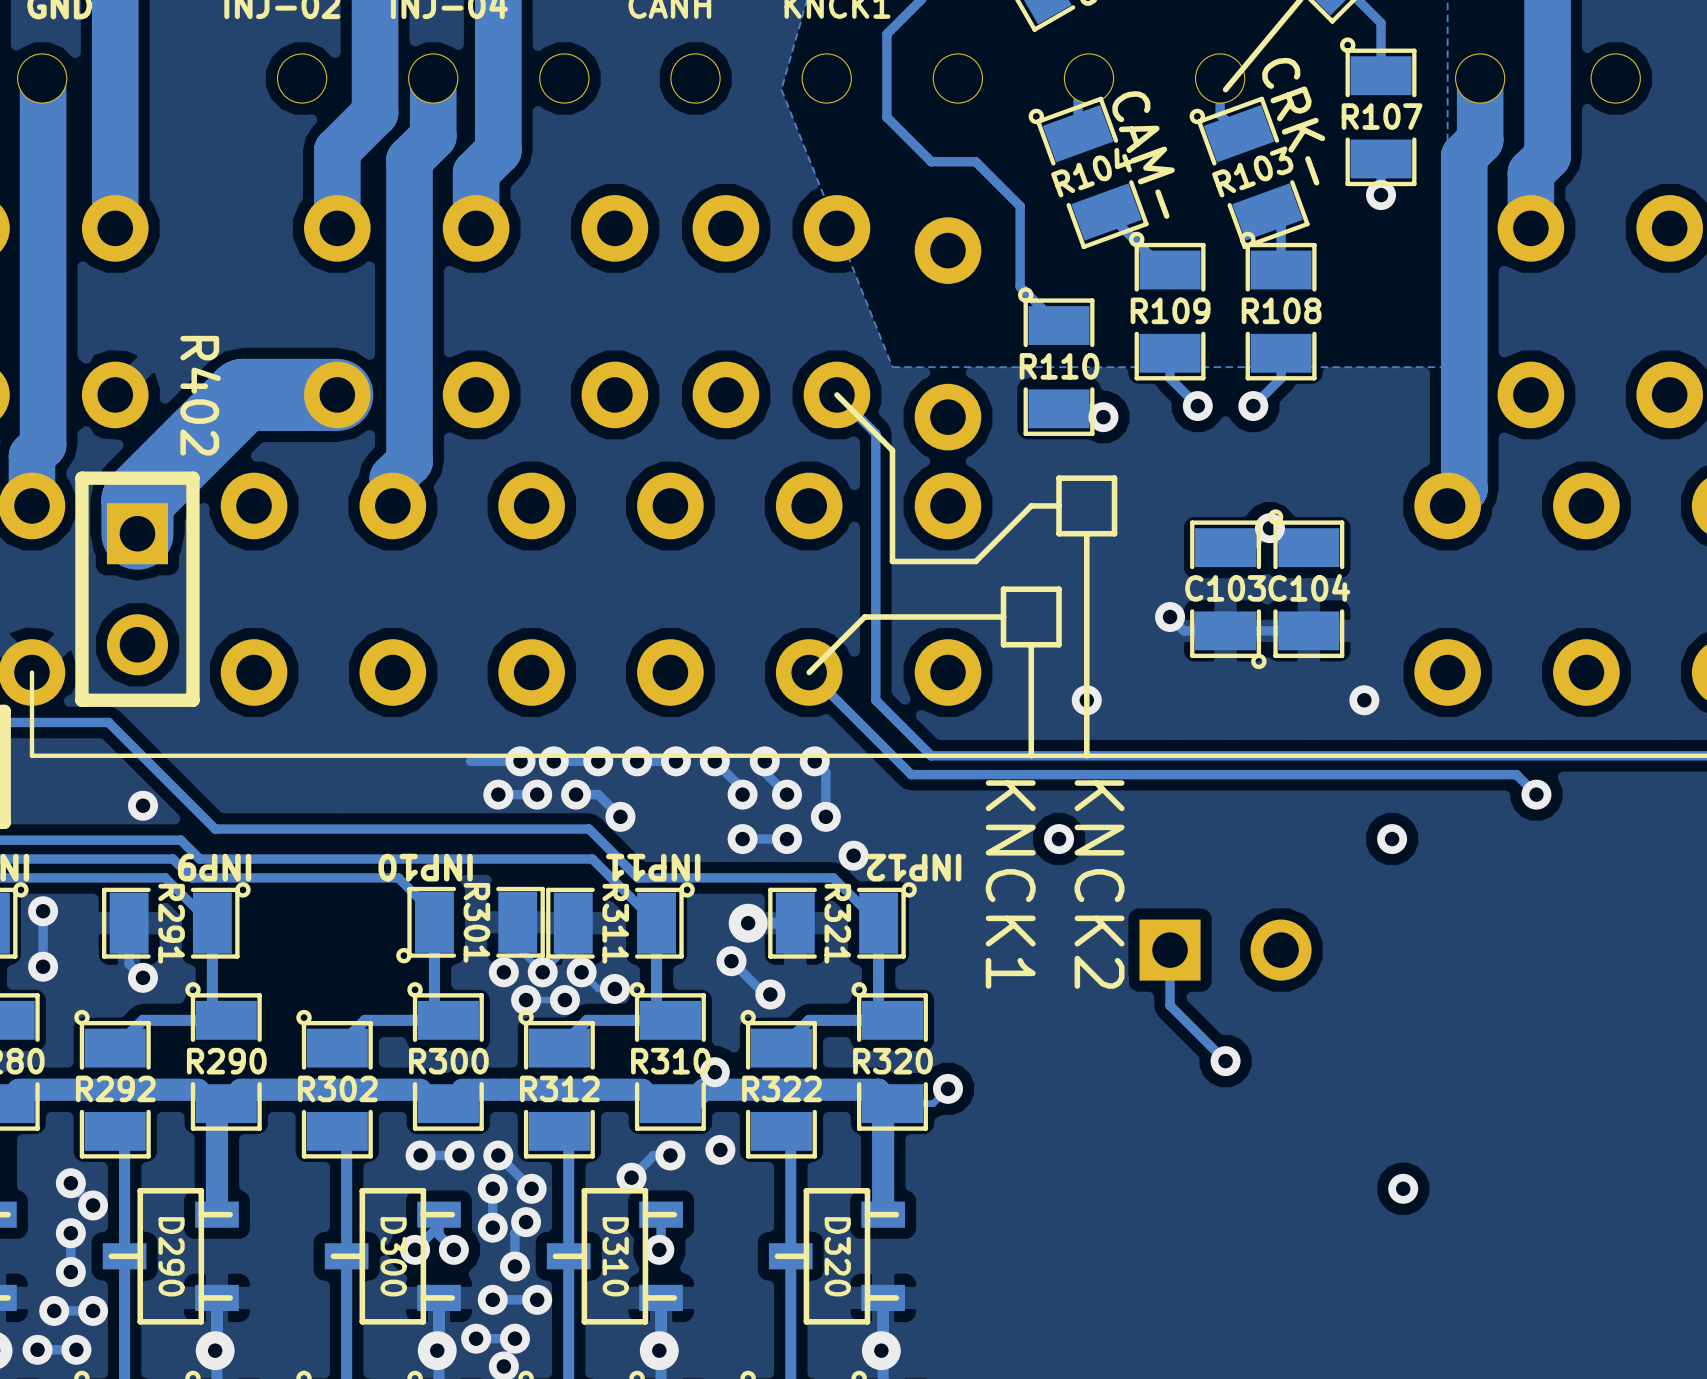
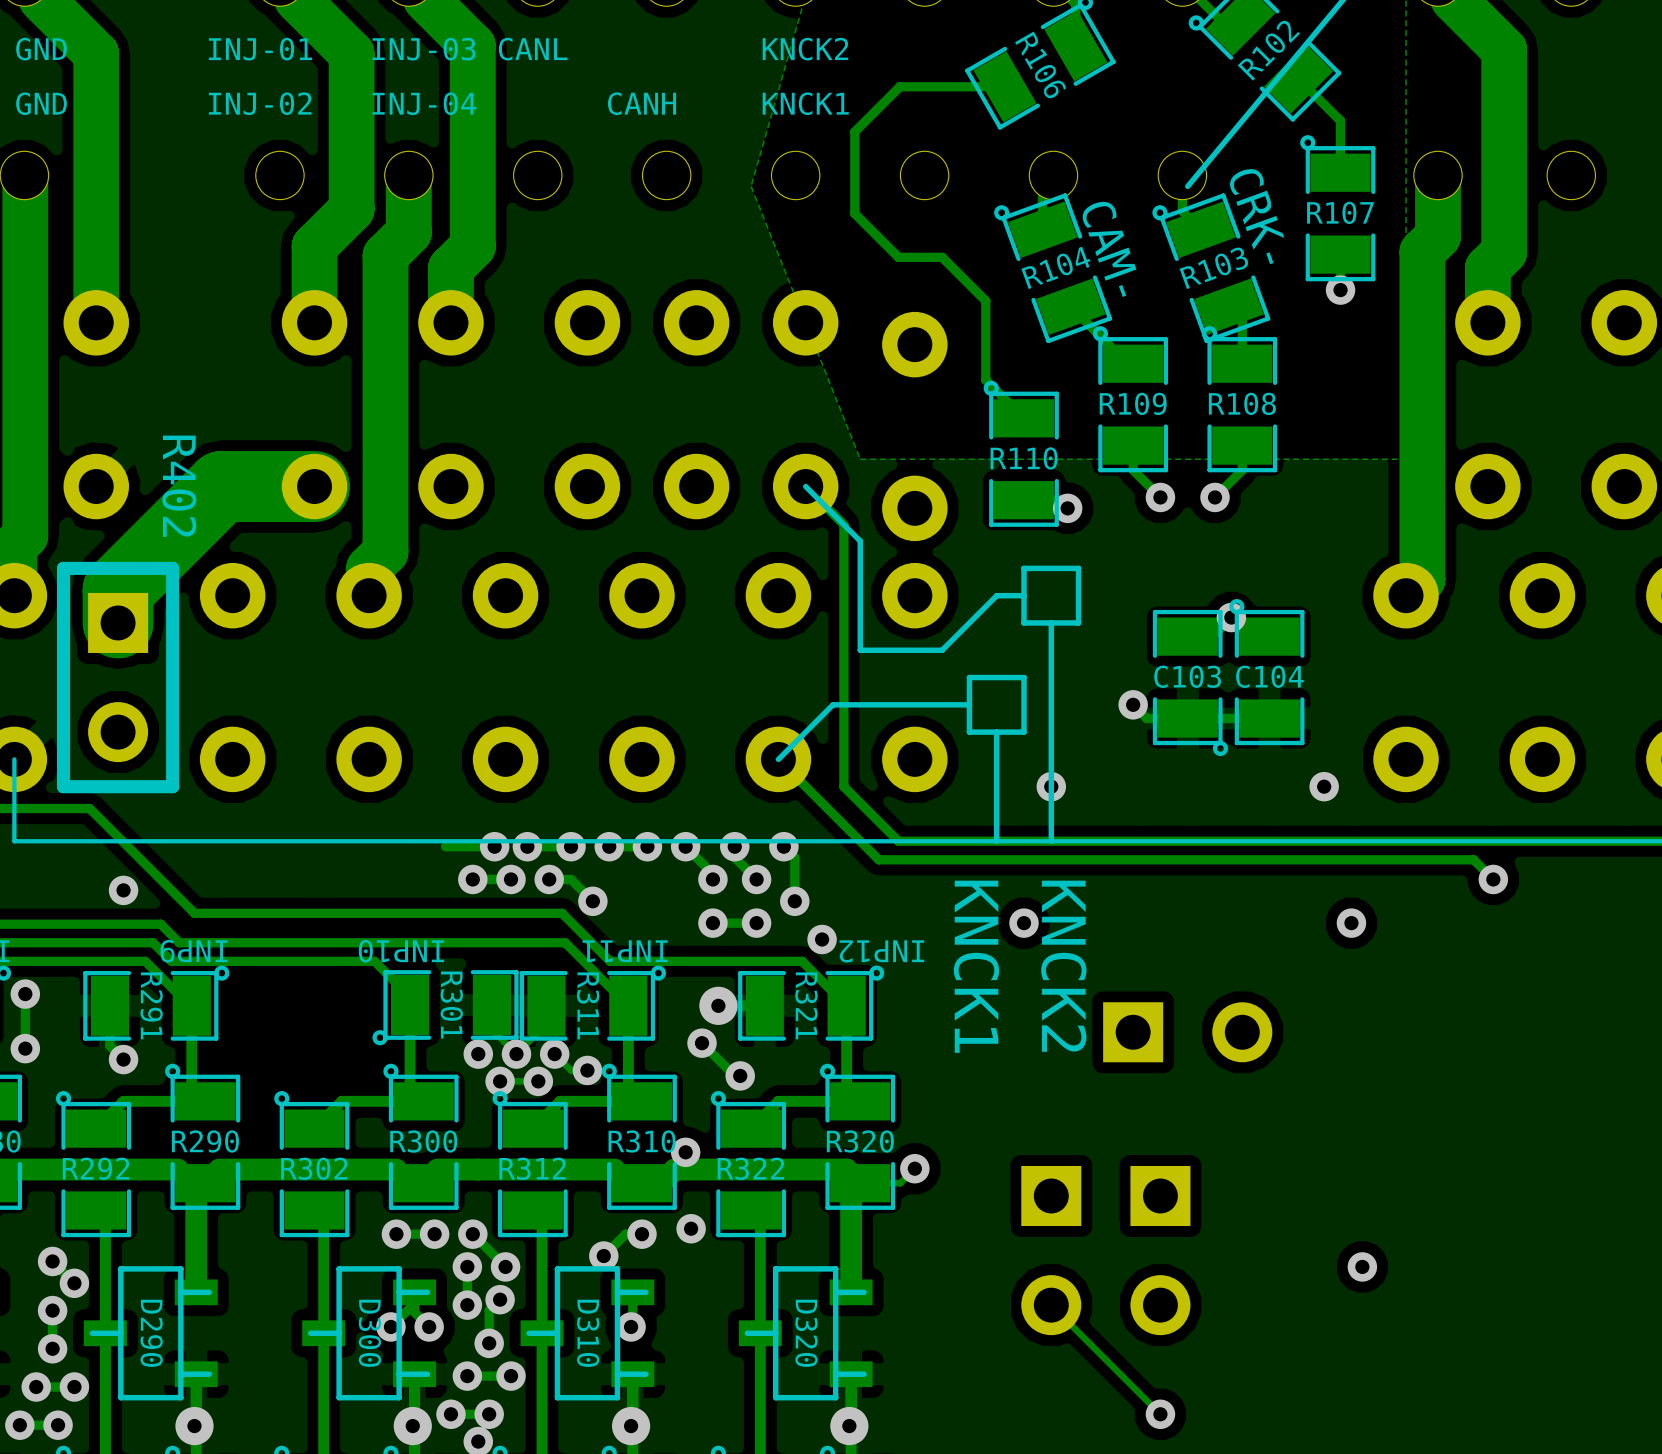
track: (1170, 950) (1170, 1005) (1225, 1061) -> none
via: (1225, 1061) -> none
part: none -> (1051, 1250)
part: none -> (1160, 1250)
track: none -> (1051, 1305) (1160, 1414)
via: none -> (1160, 1414)

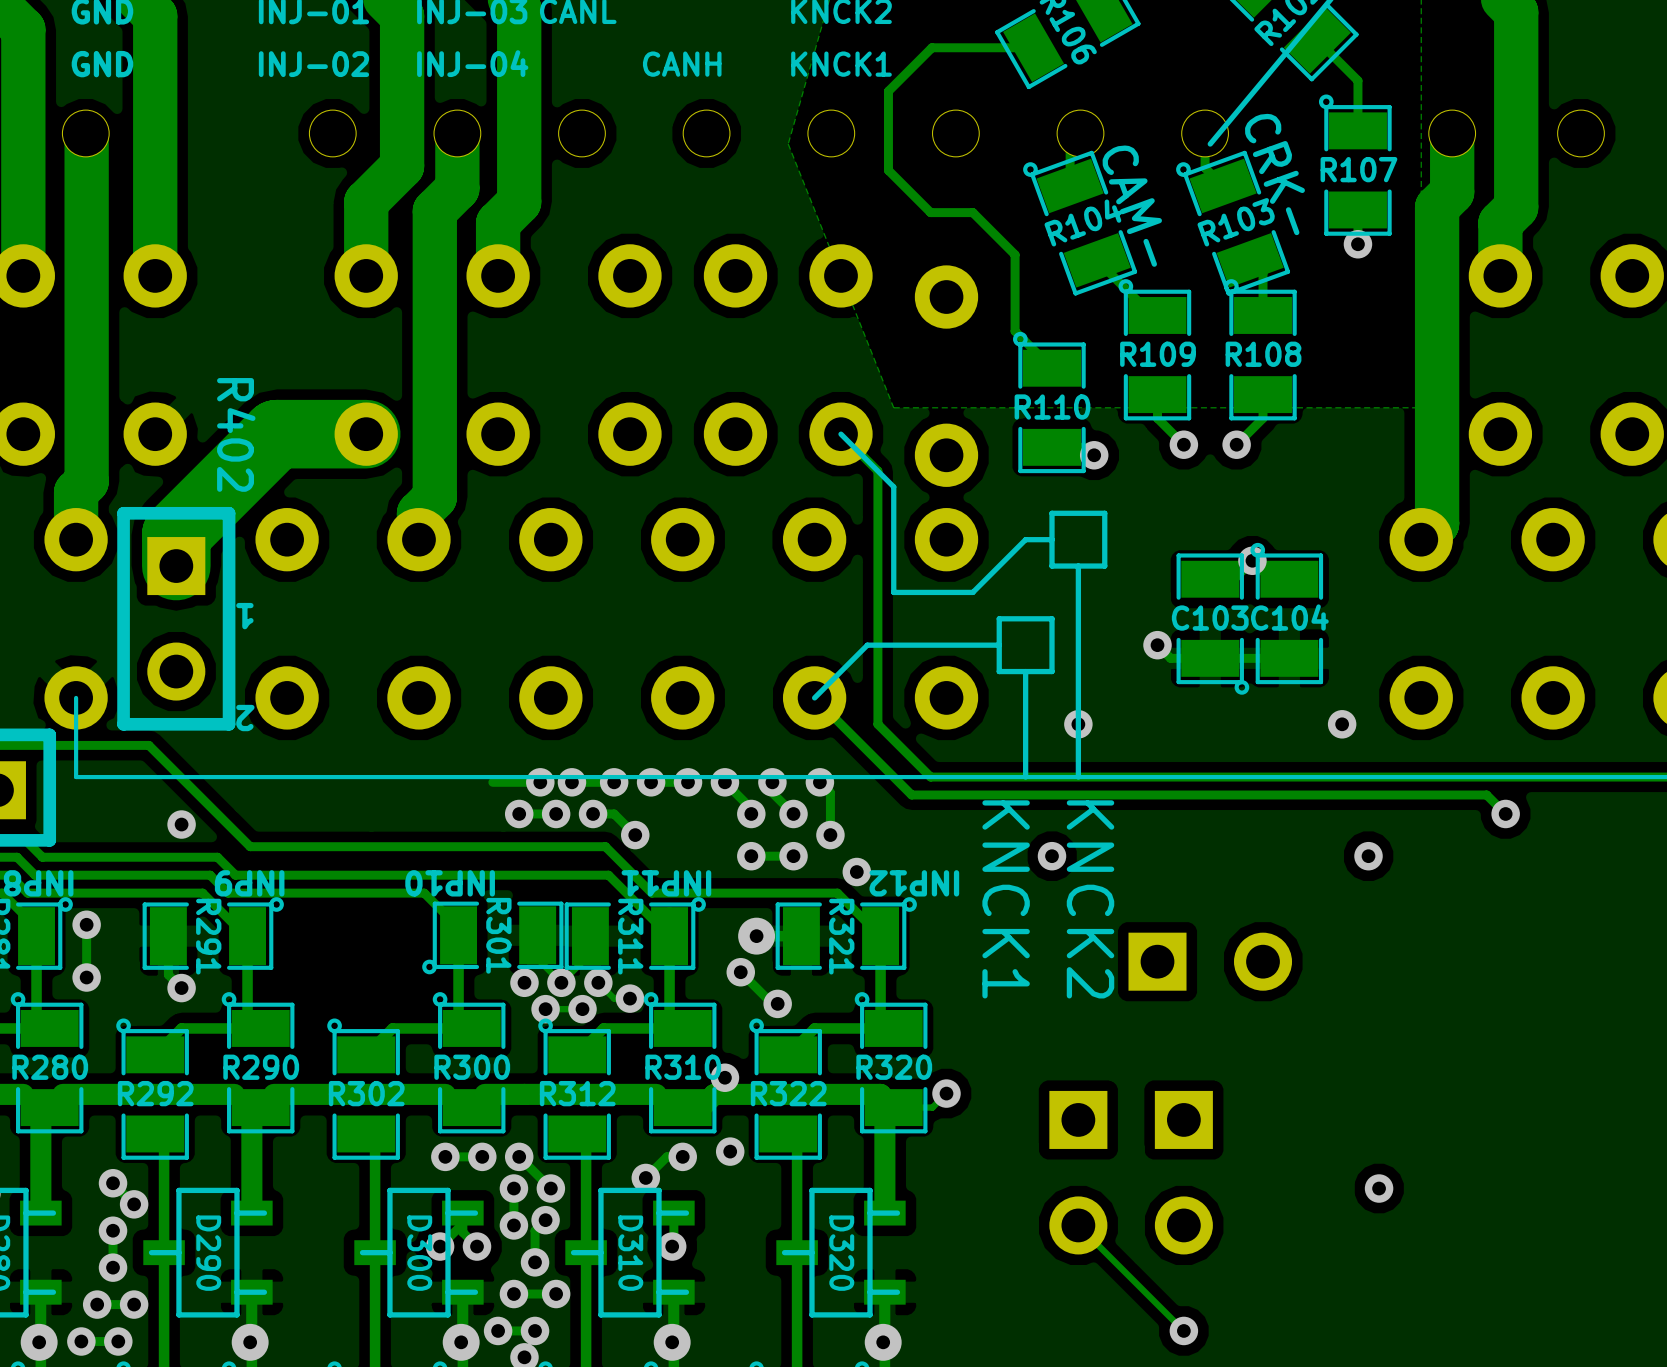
text: none -> 1 (244, 616)
text: none -> 2 (245, 718)

